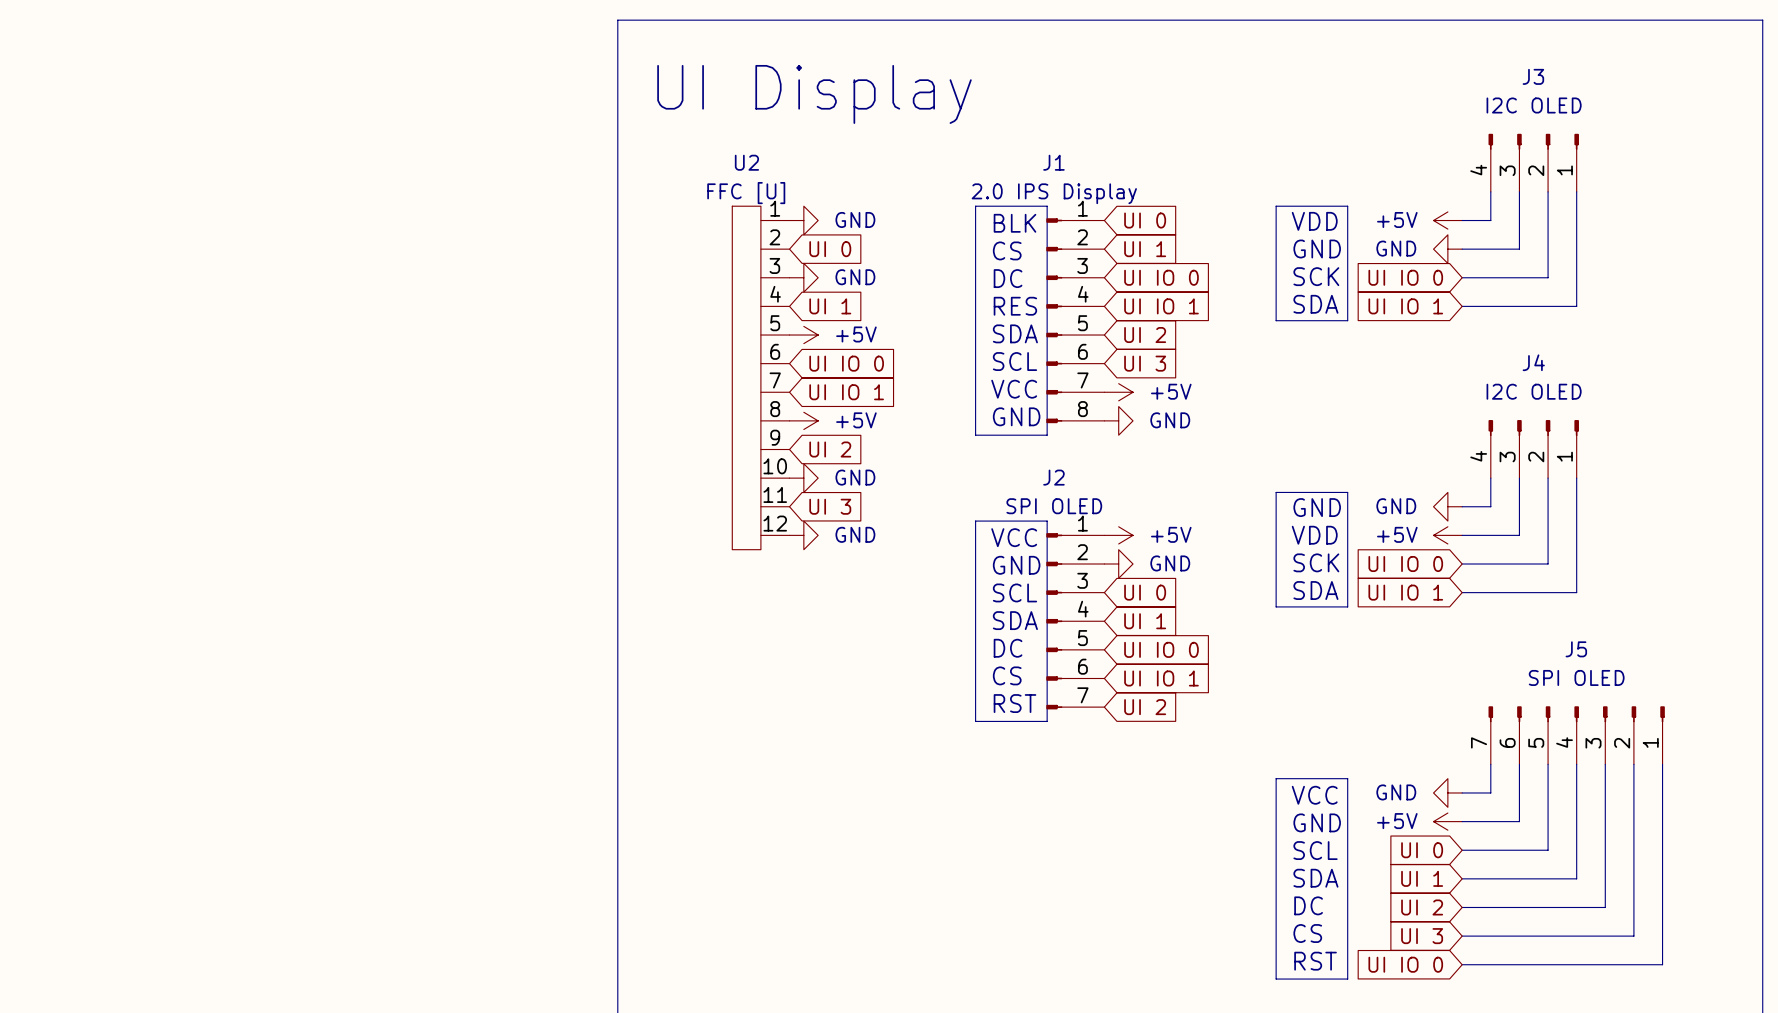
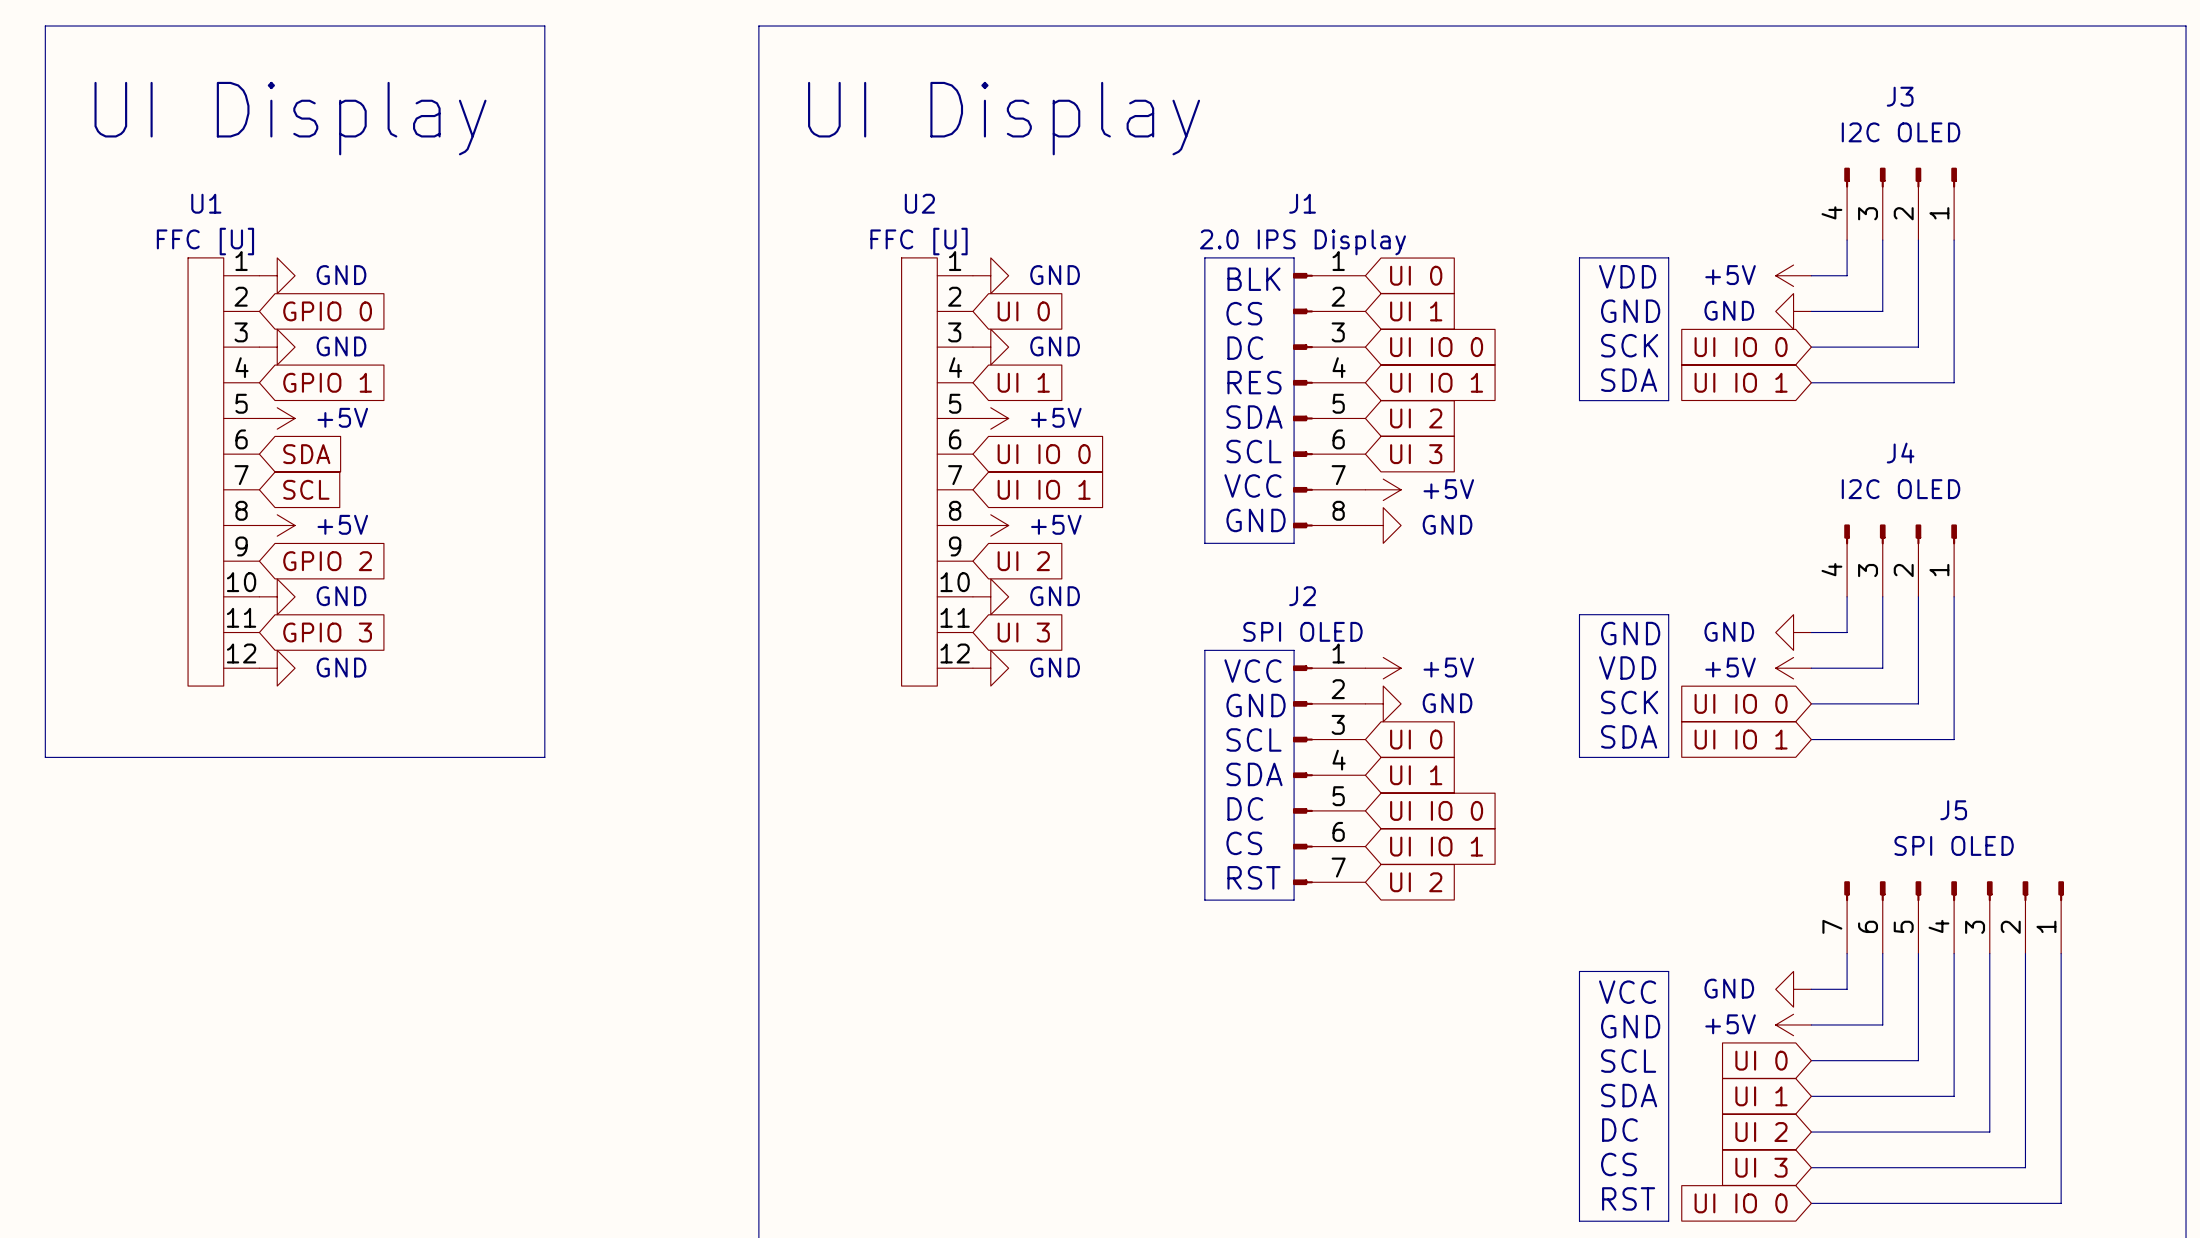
line: none -> (45, 26) (544, 26) (544, 757) (45, 757) (45, 26)
text: none -> UI Display (290, 118)
power symbol: none -> GND (277, 275)
global label: none -> GPIO 0 (327, 311)
power symbol: none -> GND (277, 347)
global label: none -> GPIO 1 (327, 382)
power symbol: none -> +5V (277, 418)
global label: none -> SDA (306, 454)
U1: none -> FFC [U] (223, 471)
global label: none -> SCL (306, 489)
power symbol: none -> +5V (277, 525)
global label: none -> GPIO 2 (327, 561)
power symbol: none -> GND (277, 596)
global label: none -> GPIO 3 (327, 632)
power symbol: none -> GND (277, 668)

